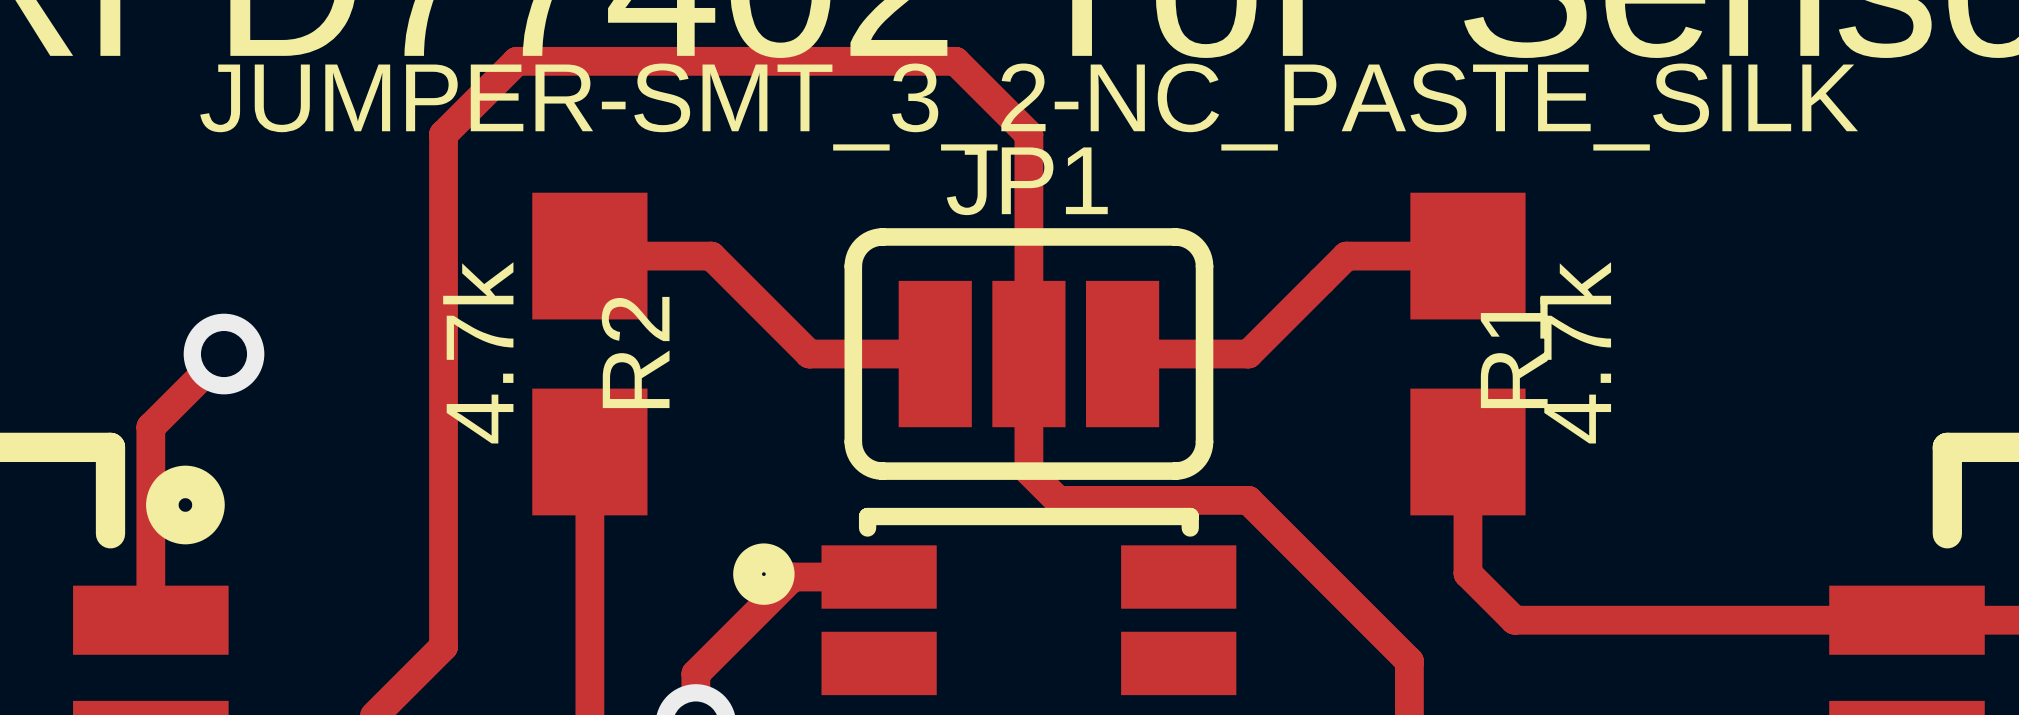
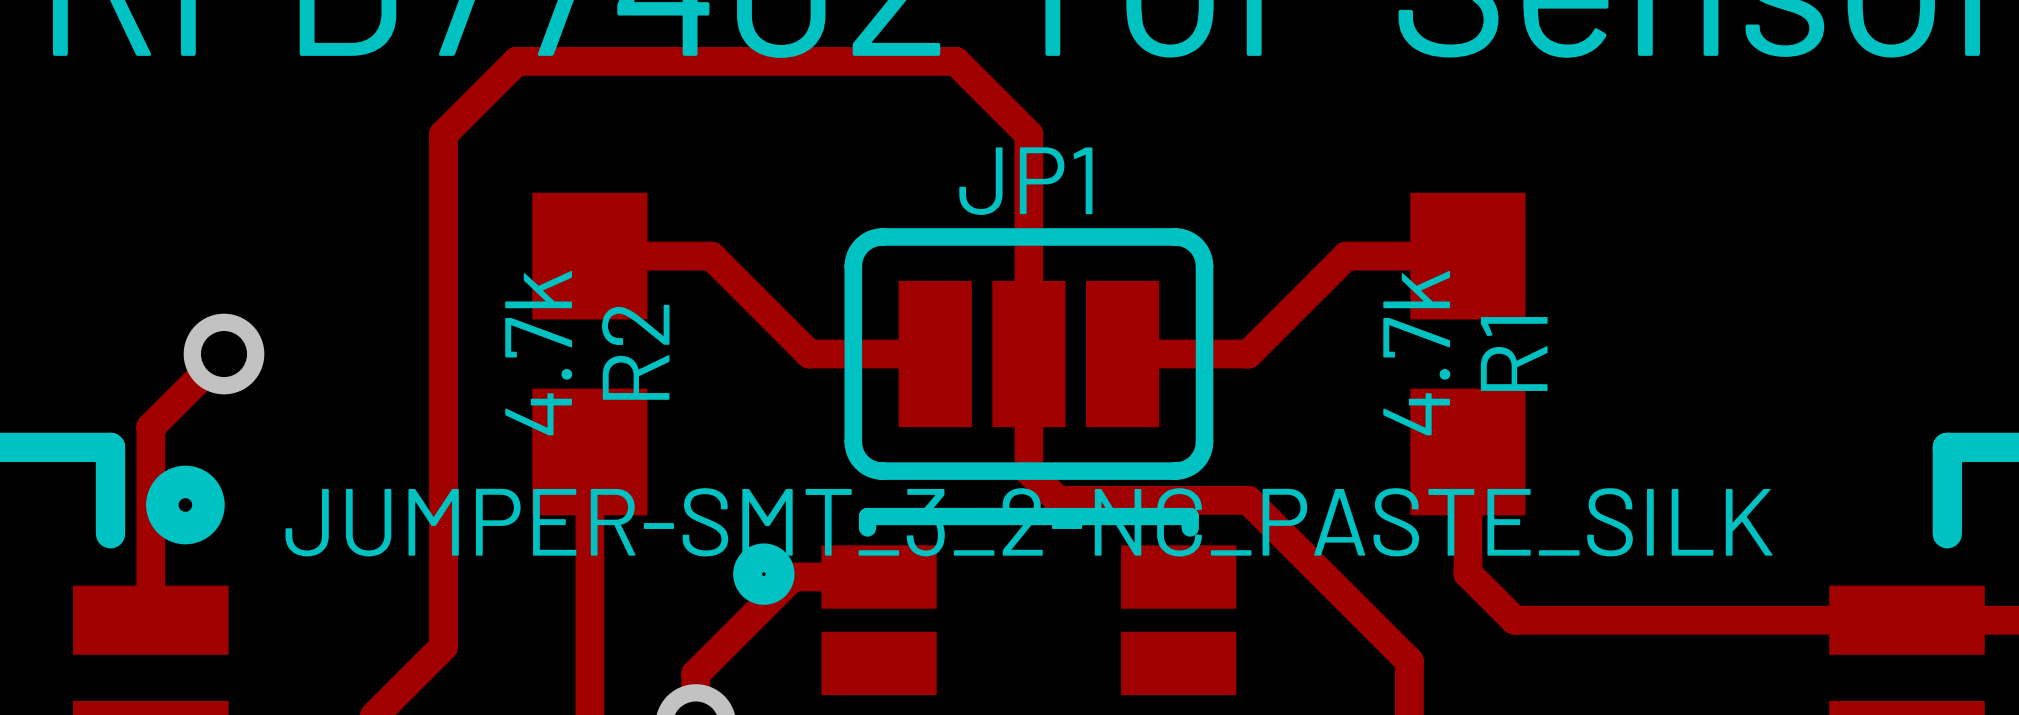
JP1 value position: JUMPER-SMT_3_2-NC_PASTE_SILK (1029, 107) -> JUMPER-SMT_3_2-NC_PASTE_SILK (1029, 522)
R2 value position: 4.7k (478, 352) -> 4.7k (538, 353)
R1 value position: 4.7k (1575, 352) -> 4.7k (1416, 353)

